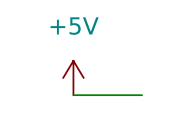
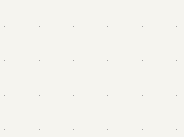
power symbol: +5V (73, 78) -> none
wire: (73, 95) (142, 95) -> none

